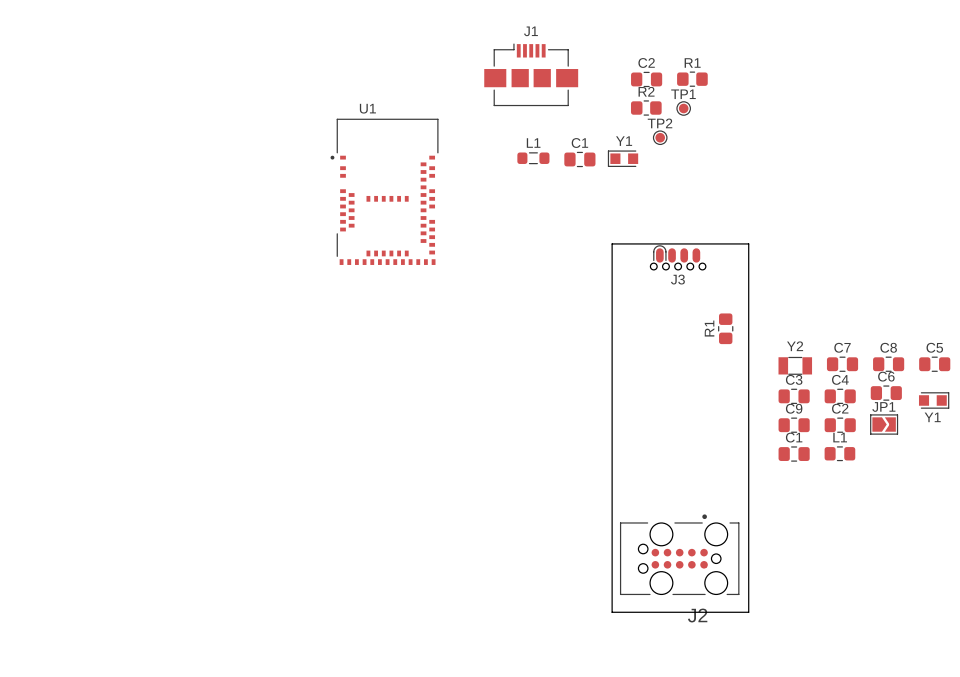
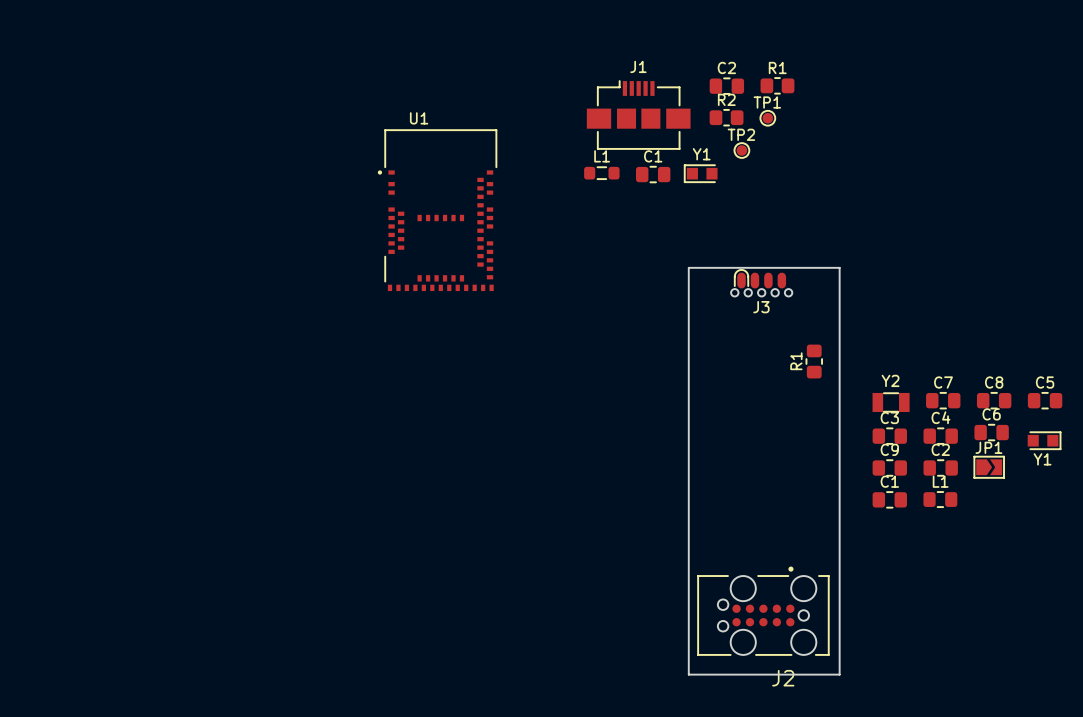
J1 position: (531, 74) -> (638, 115)

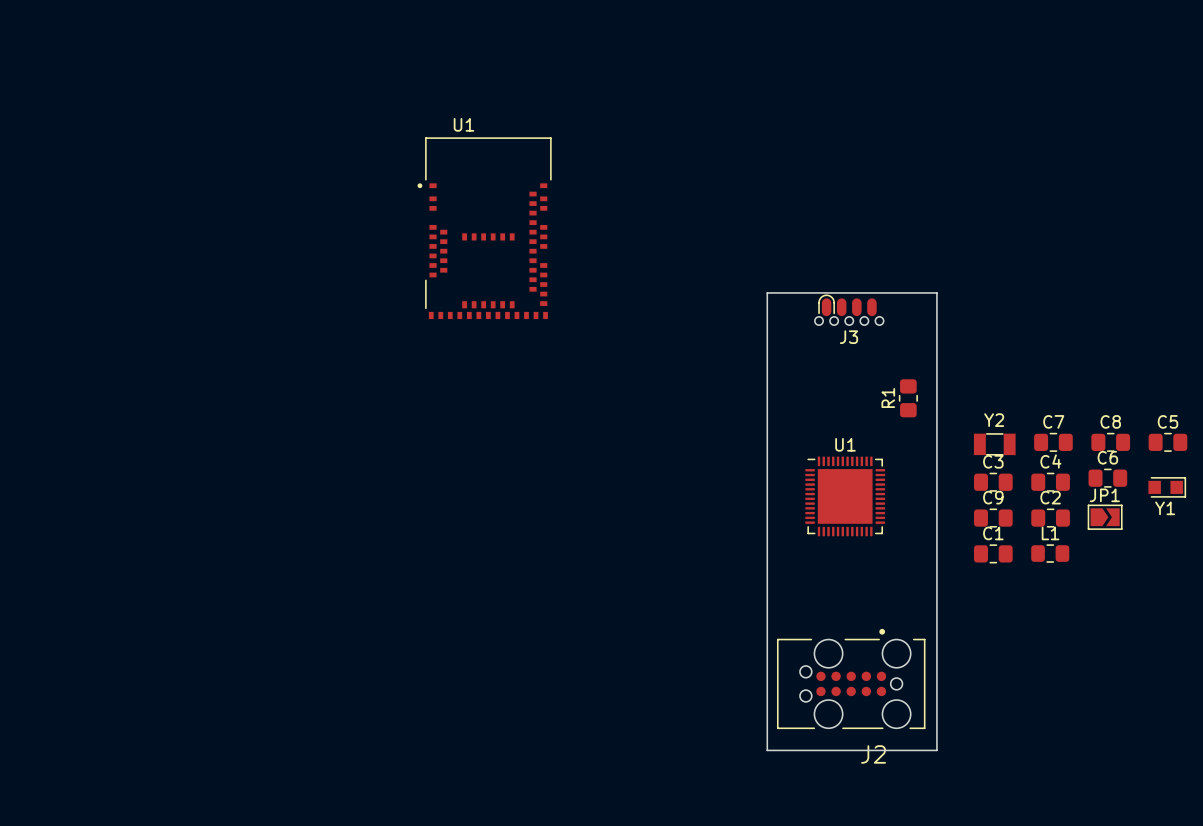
R1: (777, 85) -> none
C2: (726, 86) -> none
J1: (638, 115) -> none
R2: (726, 117) -> none
TP1: (767, 118) -> none
TP2: (741, 150) -> none
L1: (601, 173) -> none
Y1: (700, 173) -> none
C1: (653, 174) -> none
U1: none -> (845, 496)

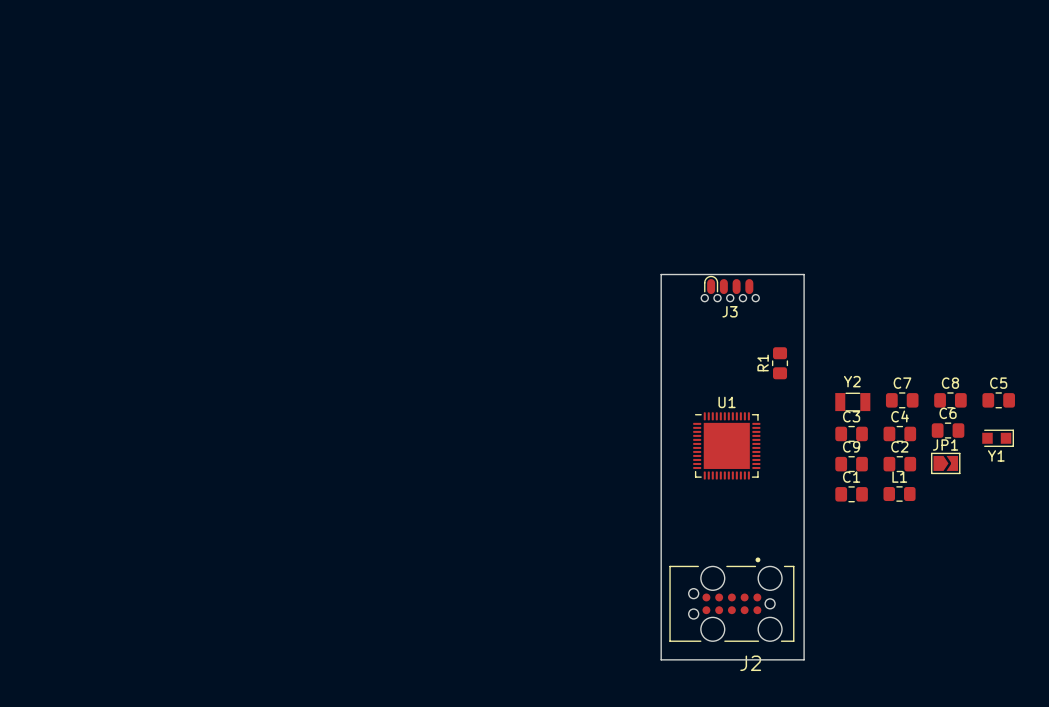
U1: (484, 228) -> none

